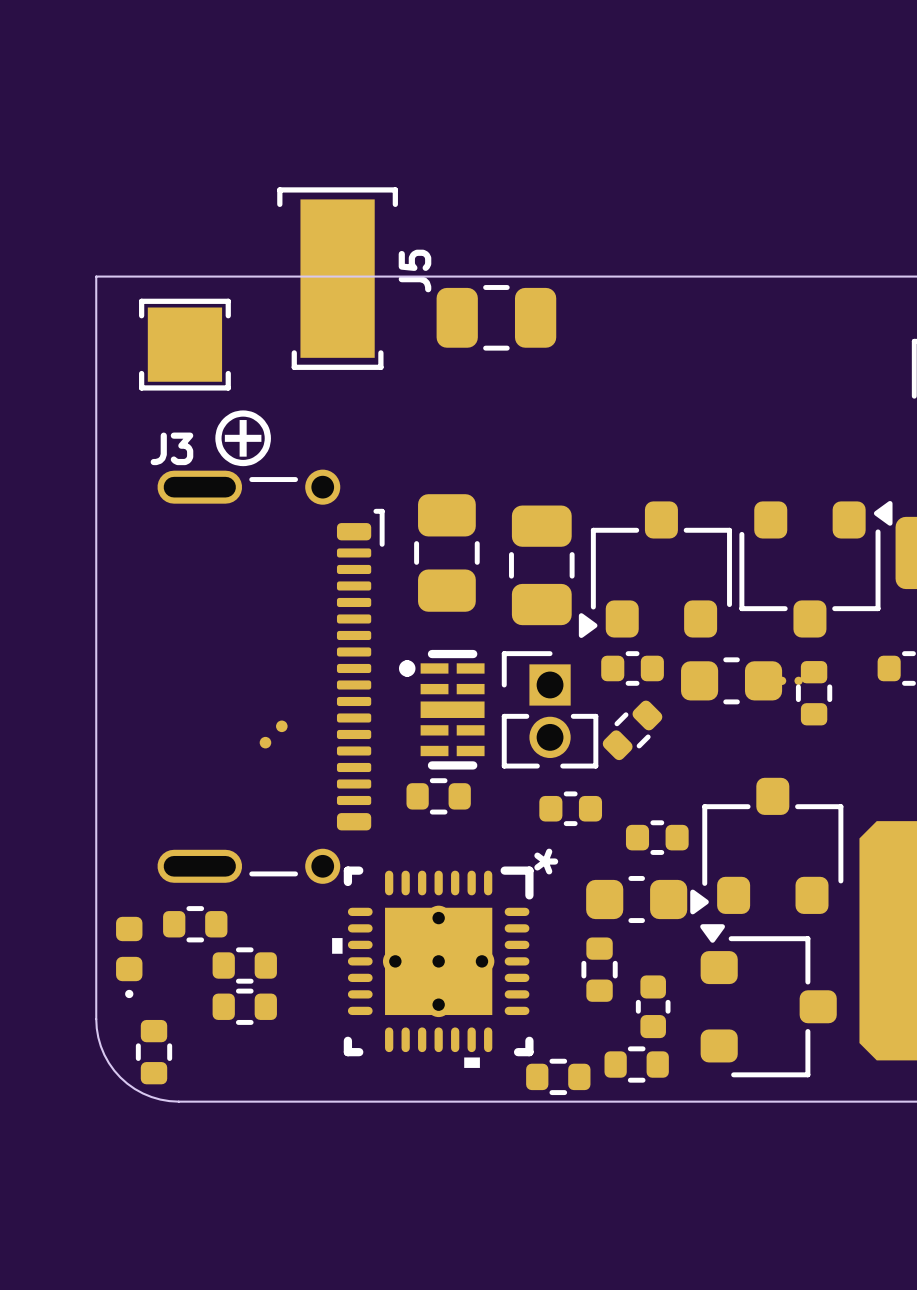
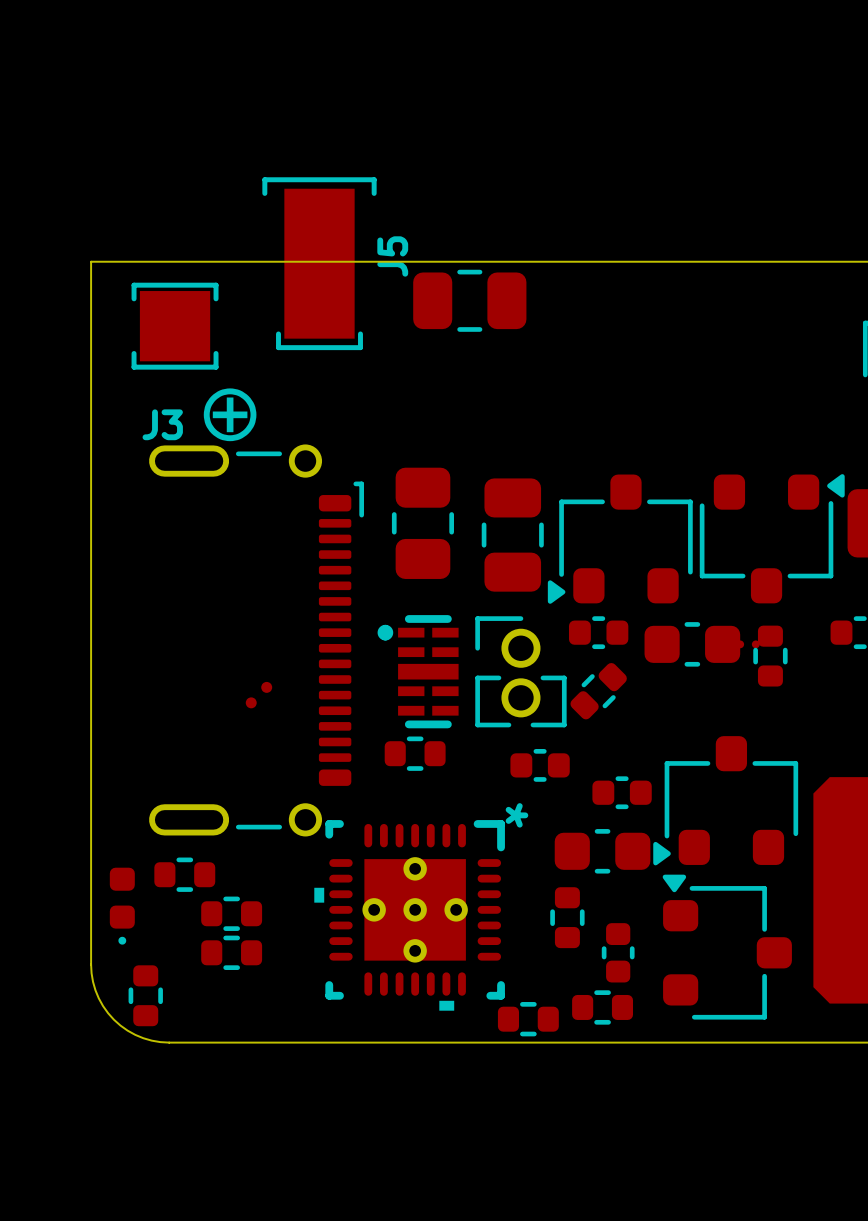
part footprint: [501, 651, 599, 769] -> [475, 616, 567, 728]

